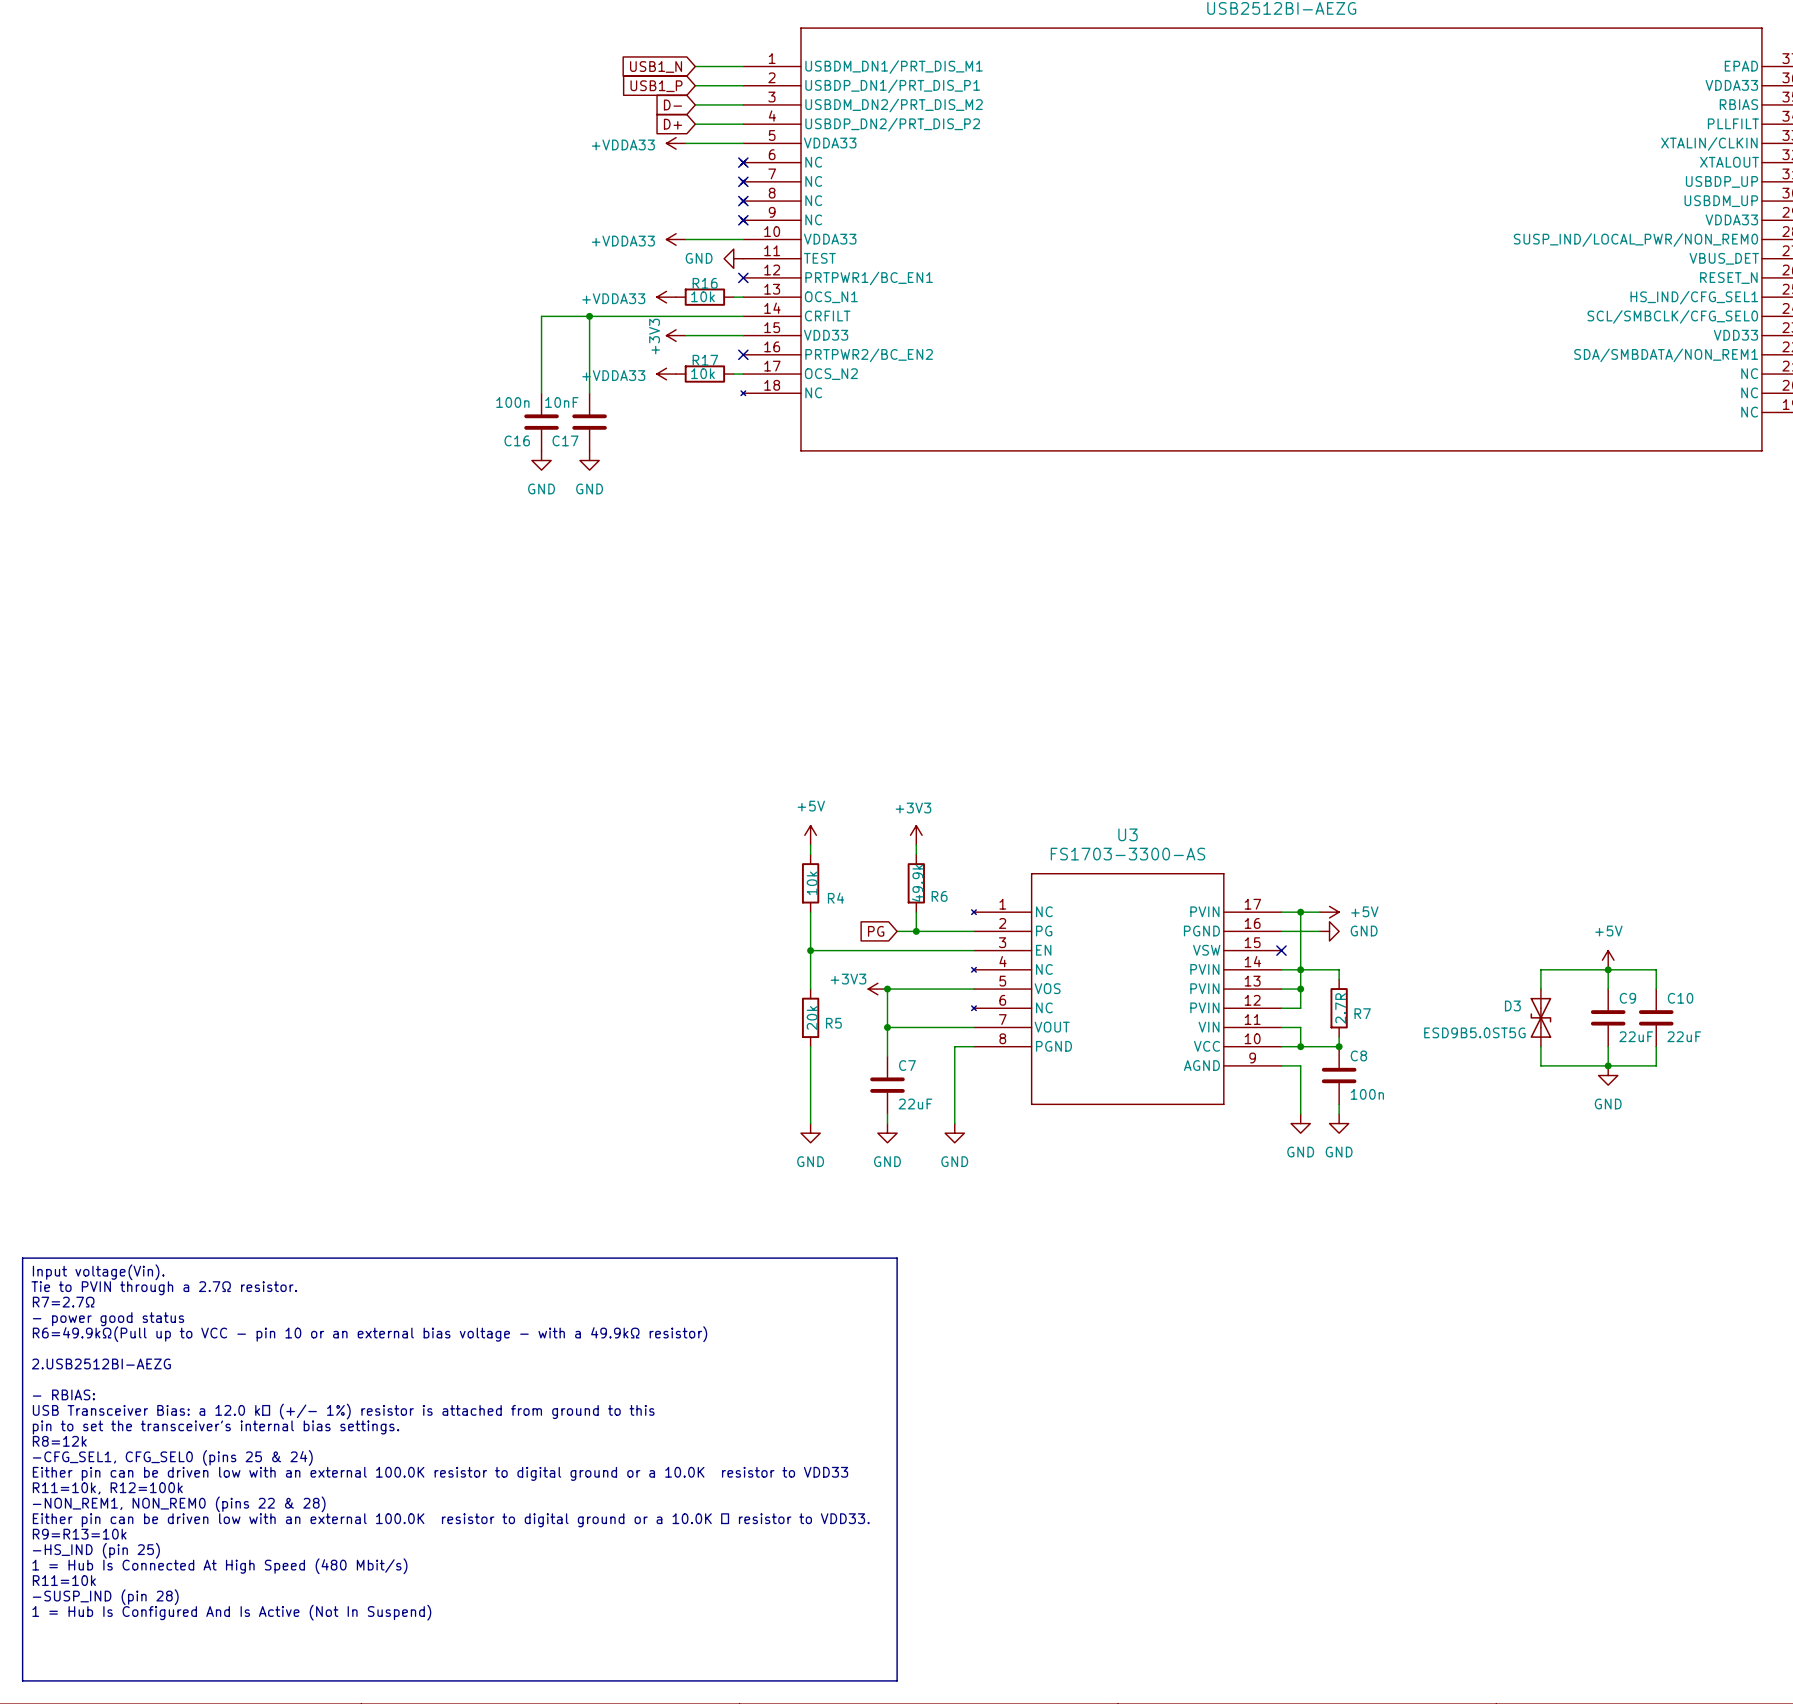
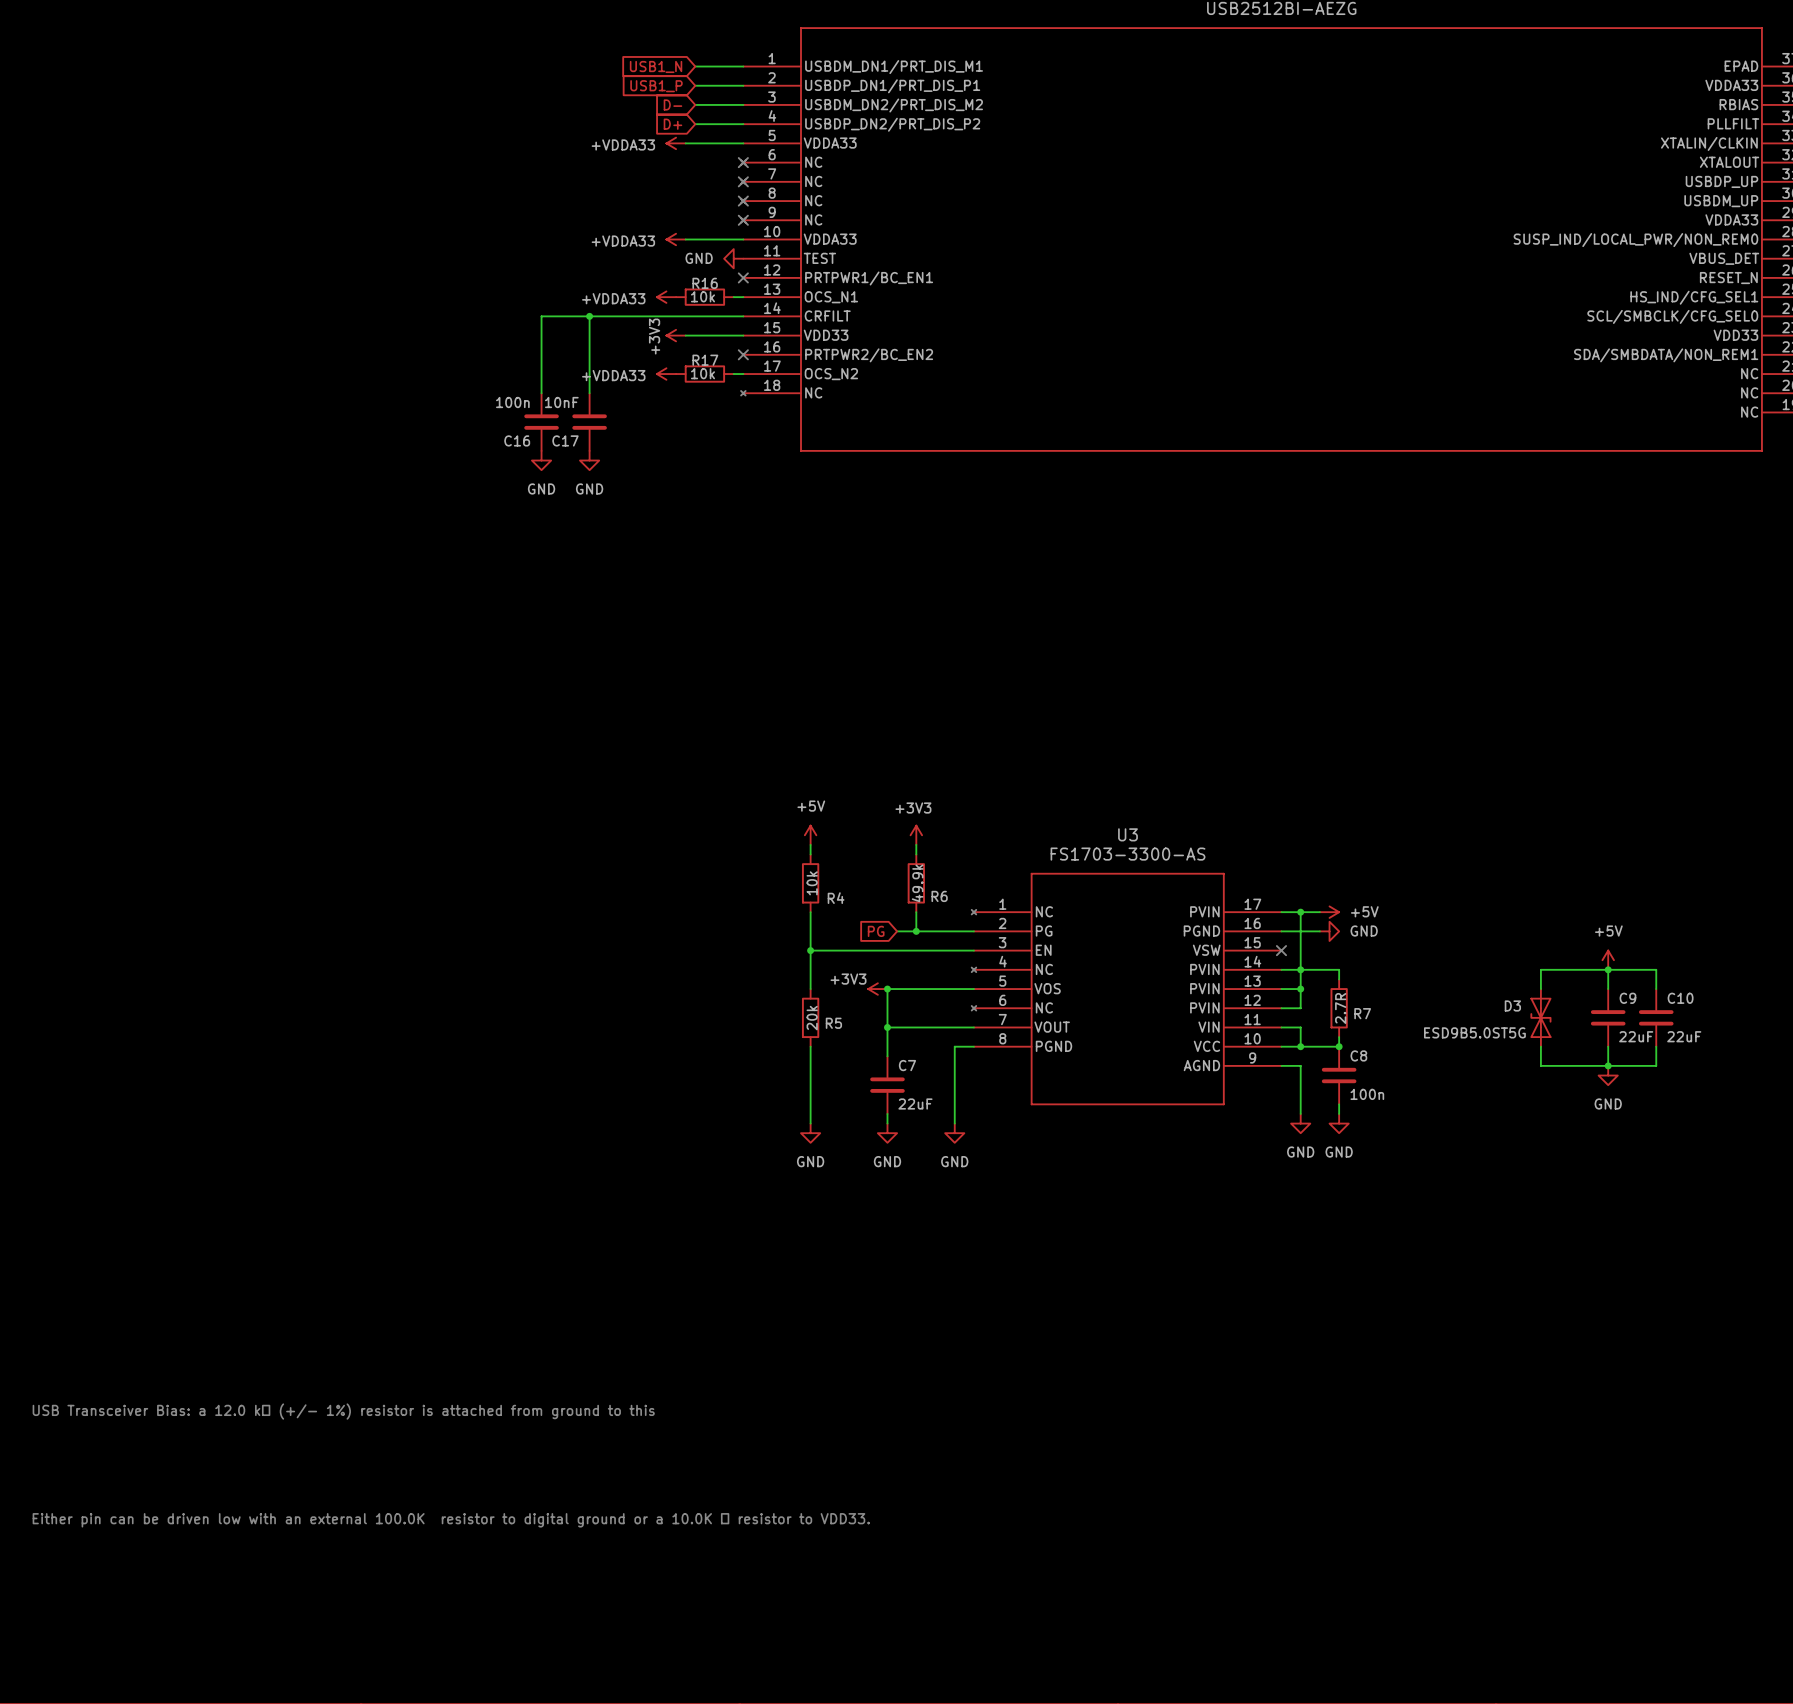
line: (22, 1258) (897, 1258) (897, 1680) (22, 1680) (22, 1258) -> none
text: Input voltage(Vin). (98, 1272) -> none
text: Tie to PVIN through a 2.7Ω resistor. (164, 1288) -> none
text: R7=2.7Ω (63, 1302) -> none
text: - power good status (108, 1319) -> none
text: R6=49.9kΩ(Pull up to VCC - pin 10 or an external bias voltage - with a 49.9kΩ resistor) (370, 1334) -> none
text: 2.USB2512BI-AEZG (101, 1363) -> none
text: - RBIAS: (63, 1394) -> none
text: pin to set the transceiver's internal bias settings. (216, 1427) -> none
text: R8=12k (59, 1441) -> none
text: -CFG_SEL1, CFG_SEL0 (pins 25 & 24) (172, 1457) -> none
text: Either pin can be driven low with an external 100.0K resistor to digital ground or a 10.0K resistor to VDD33 (440, 1473) -> none
text: R11=10k, R12=100k (107, 1488) -> none
text: -NON_REM1, NON_REM0 (pins 22 & 28) (179, 1504) -> none
text: R9=R13=10k (79, 1534) -> none
text: -HS_IND (pin 25) (96, 1550) -> none
text: 1 = Hub Is Connected At High Speed (480 Mbit/s) (219, 1566) -> none
text: R11=10k (64, 1580) -> none
text: -SUSP_IND (pin 28) (105, 1597) -> none
text: 1 = Hub Is Configured And Is Active (Not In Suspend) (231, 1612) -> none

